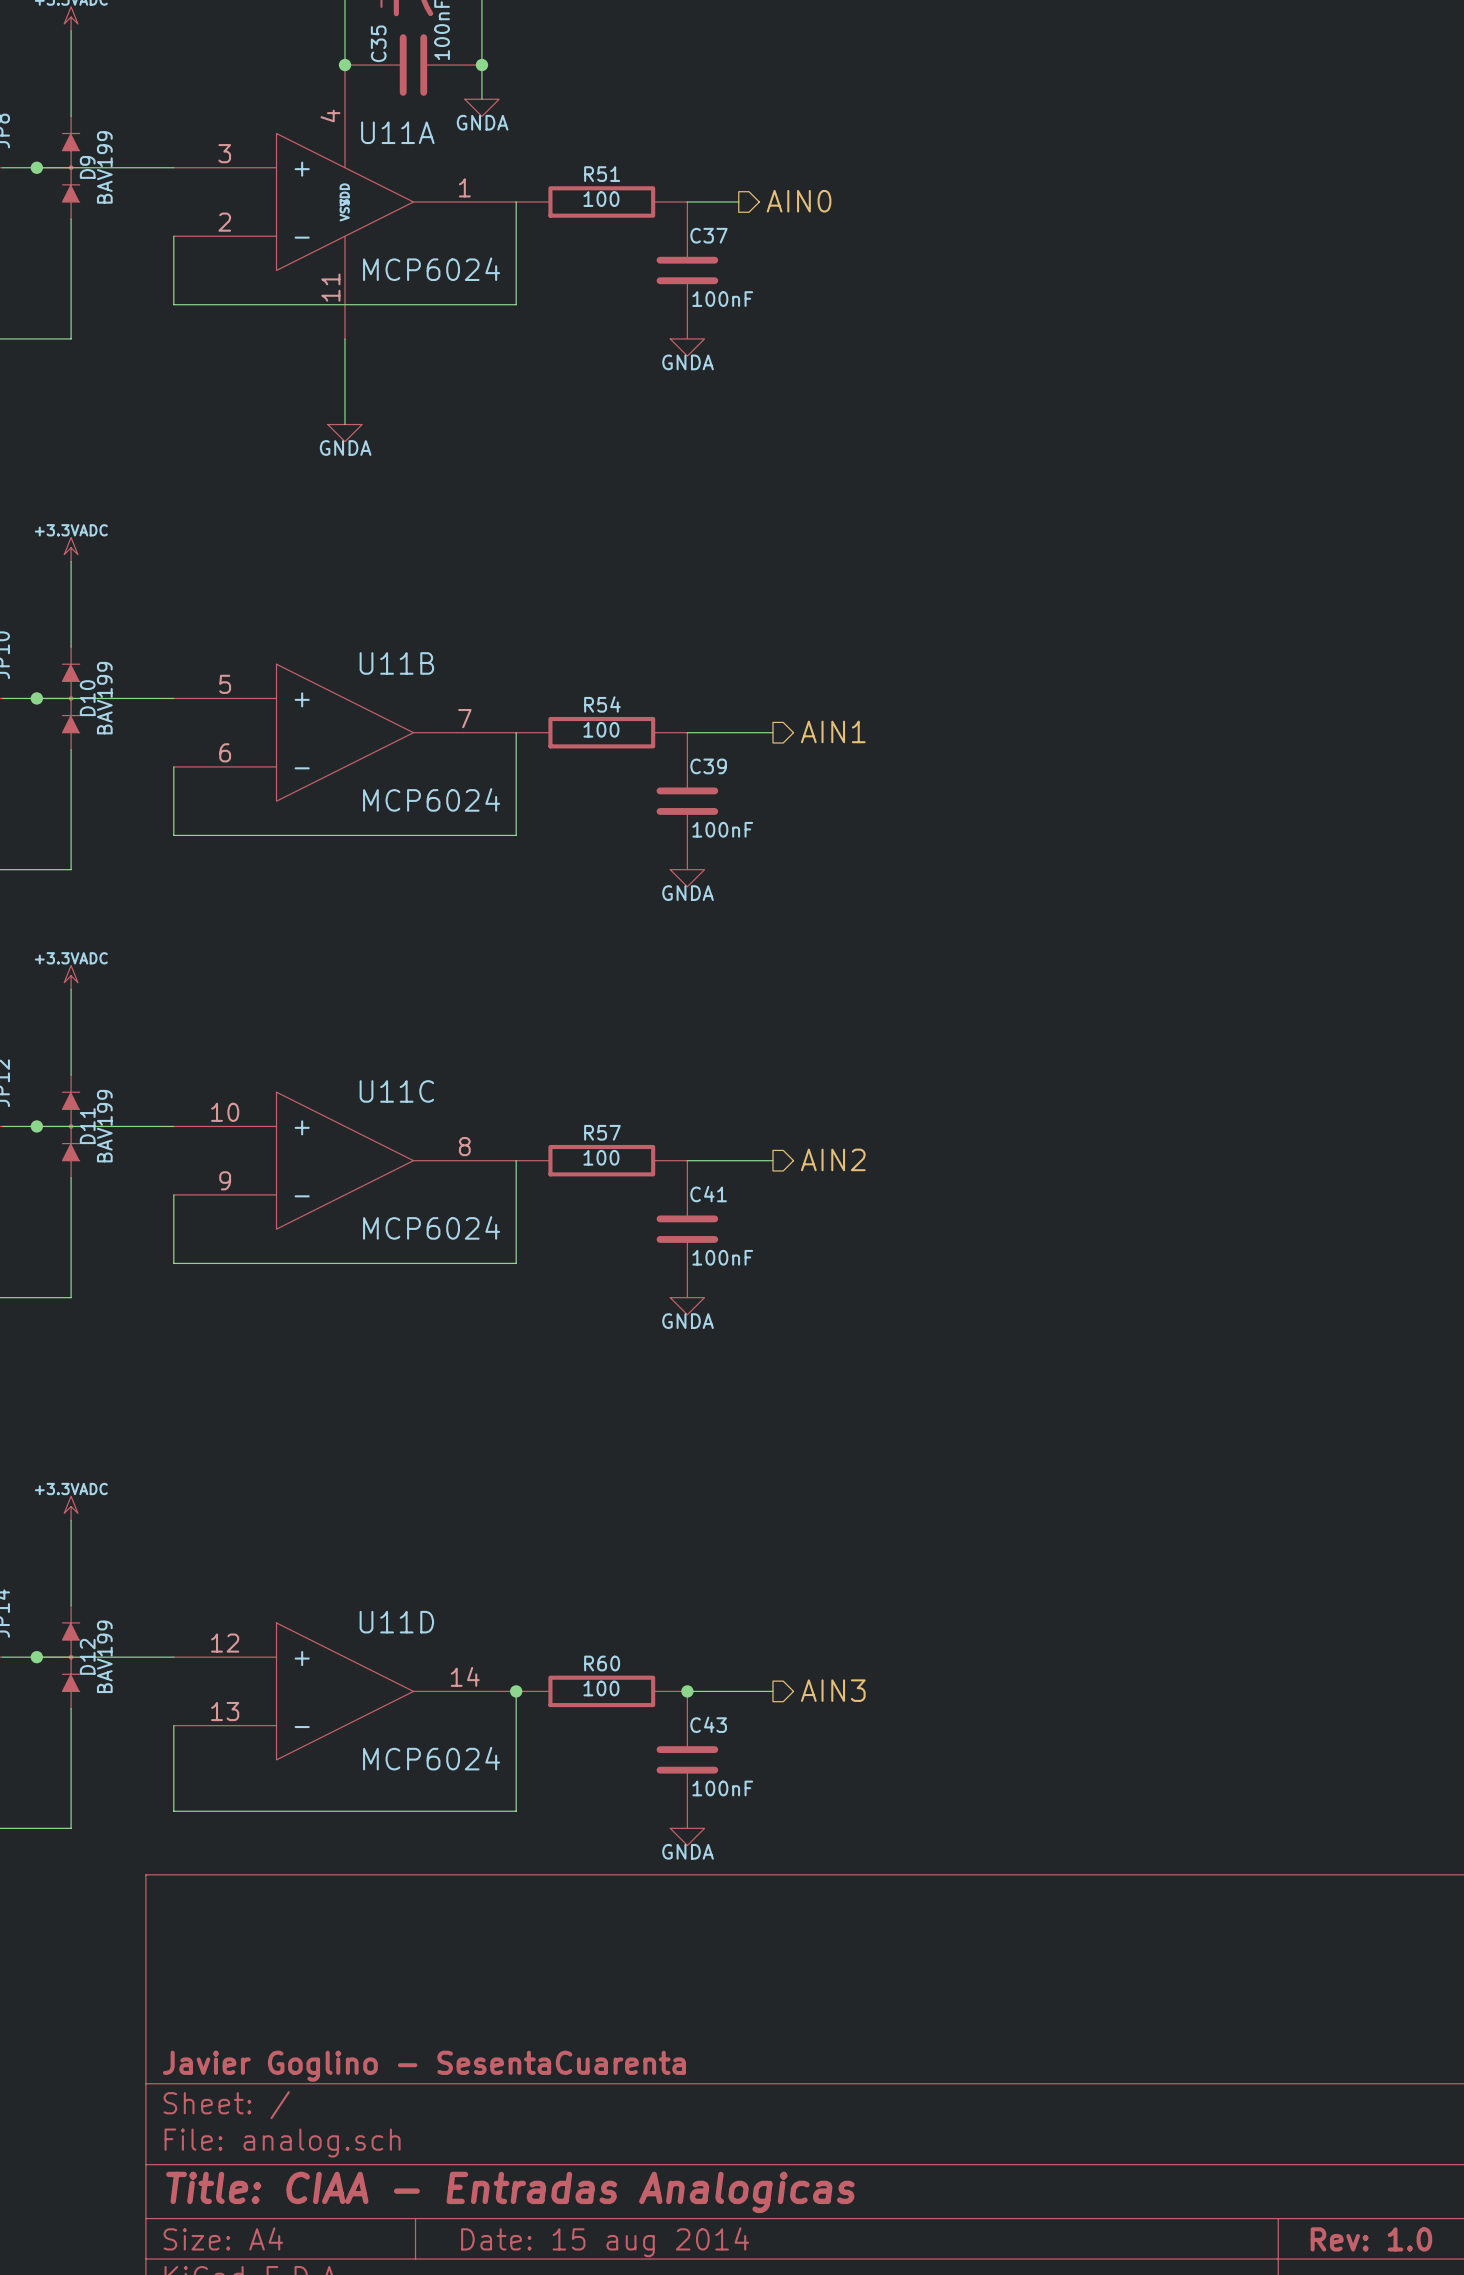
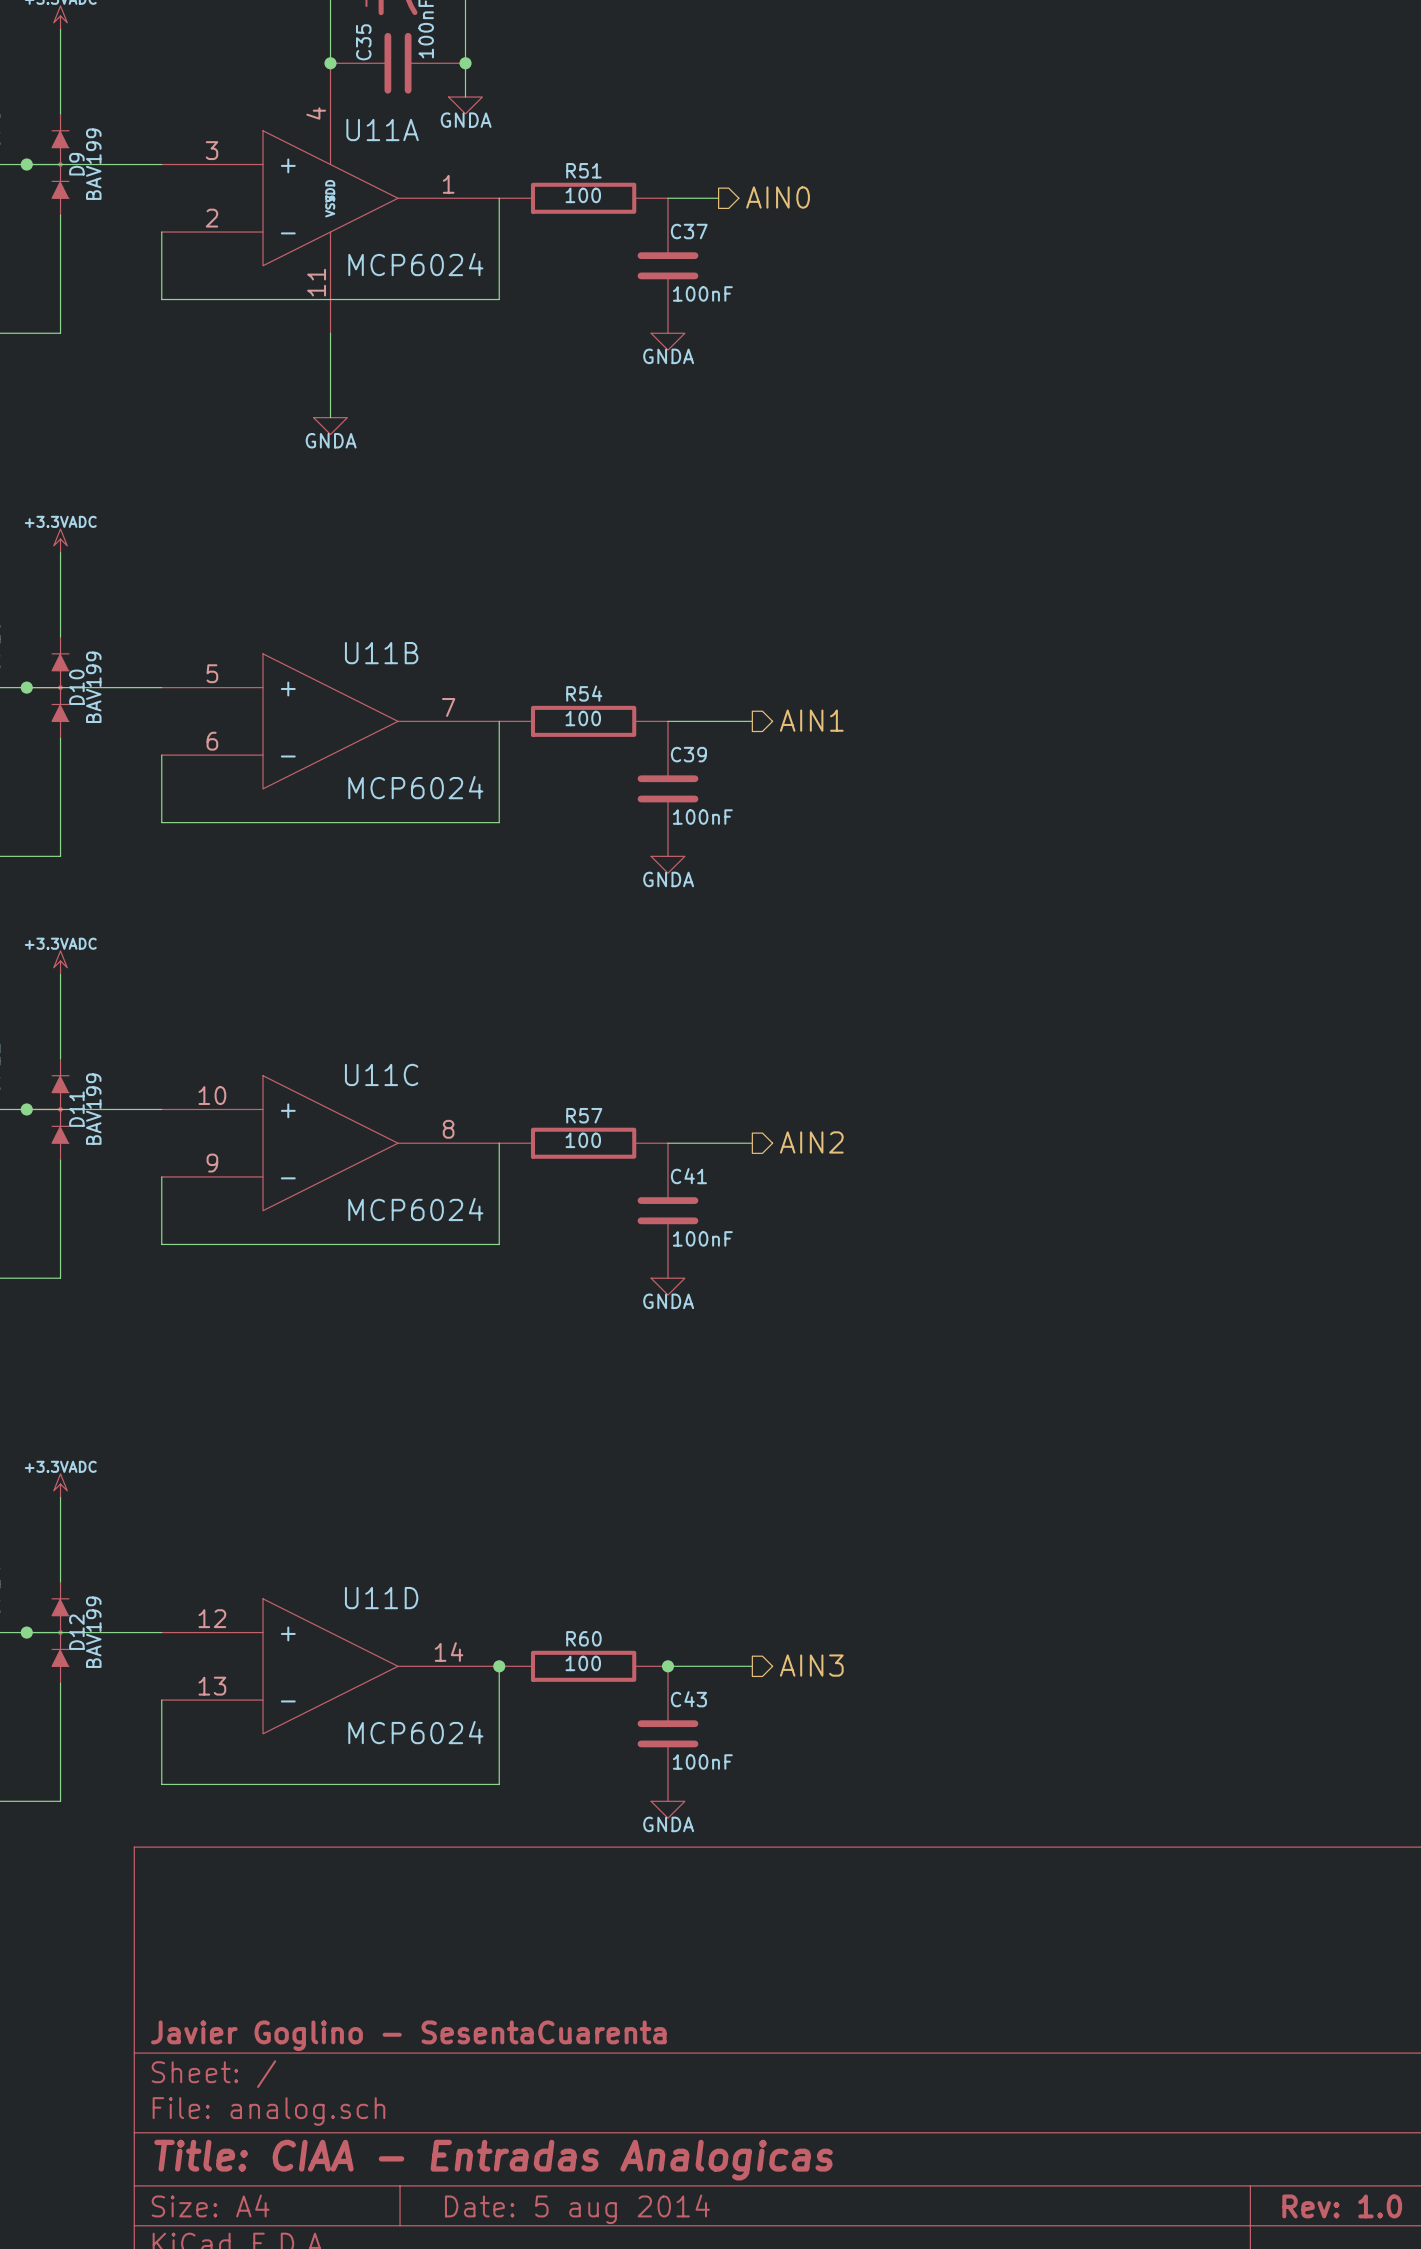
title block: Date: 15 aug 2014 (605, 2242) -> Date: 5 aug 2014 (577, 2209)

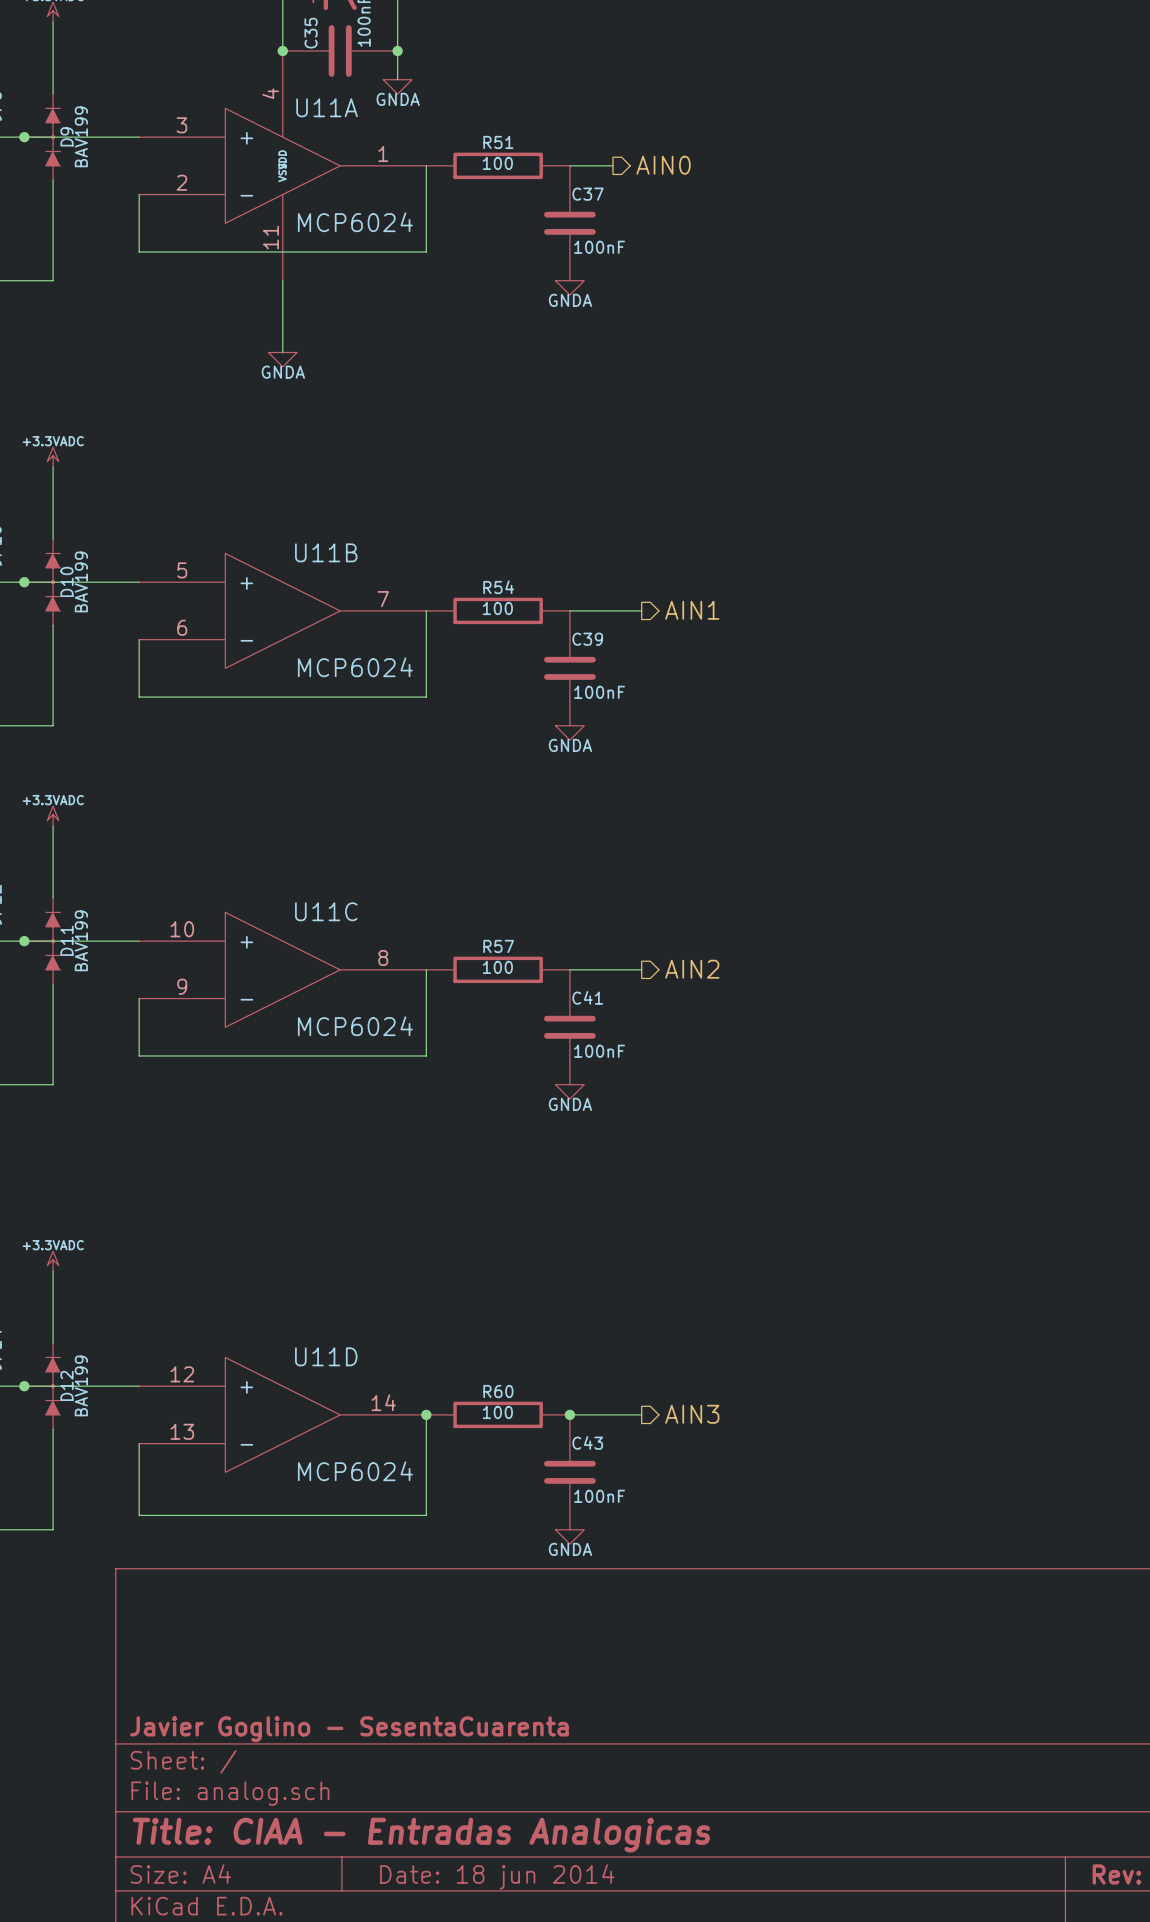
title block: Date: 5 aug 2014 (577, 2209) -> Date: 18 jun 2014 (497, 1876)

